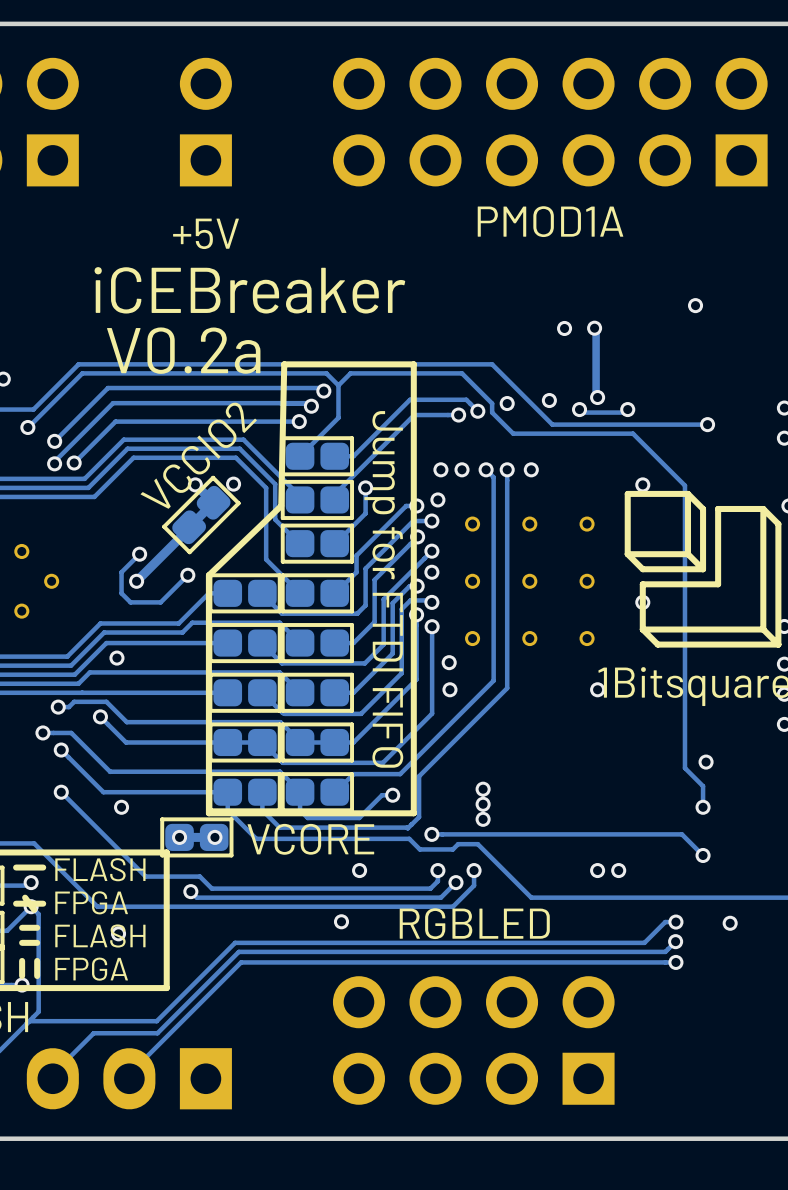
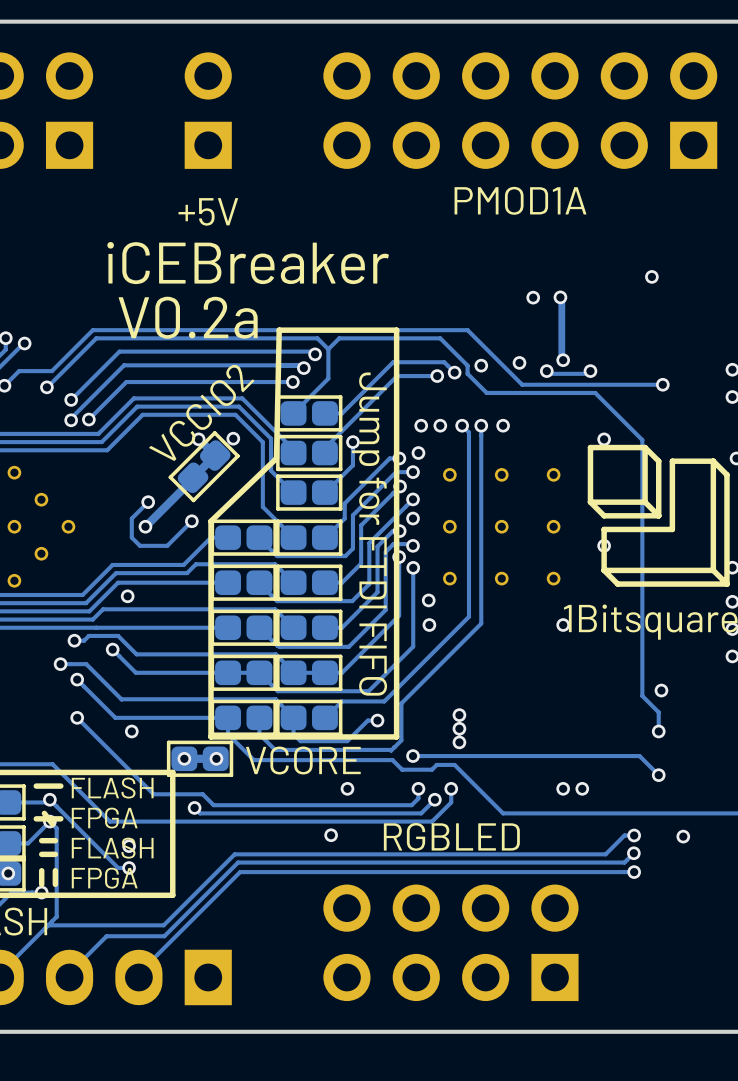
track: none -> (49, 799) (118, 868) (129, 868)
via: none -> (129, 868)

